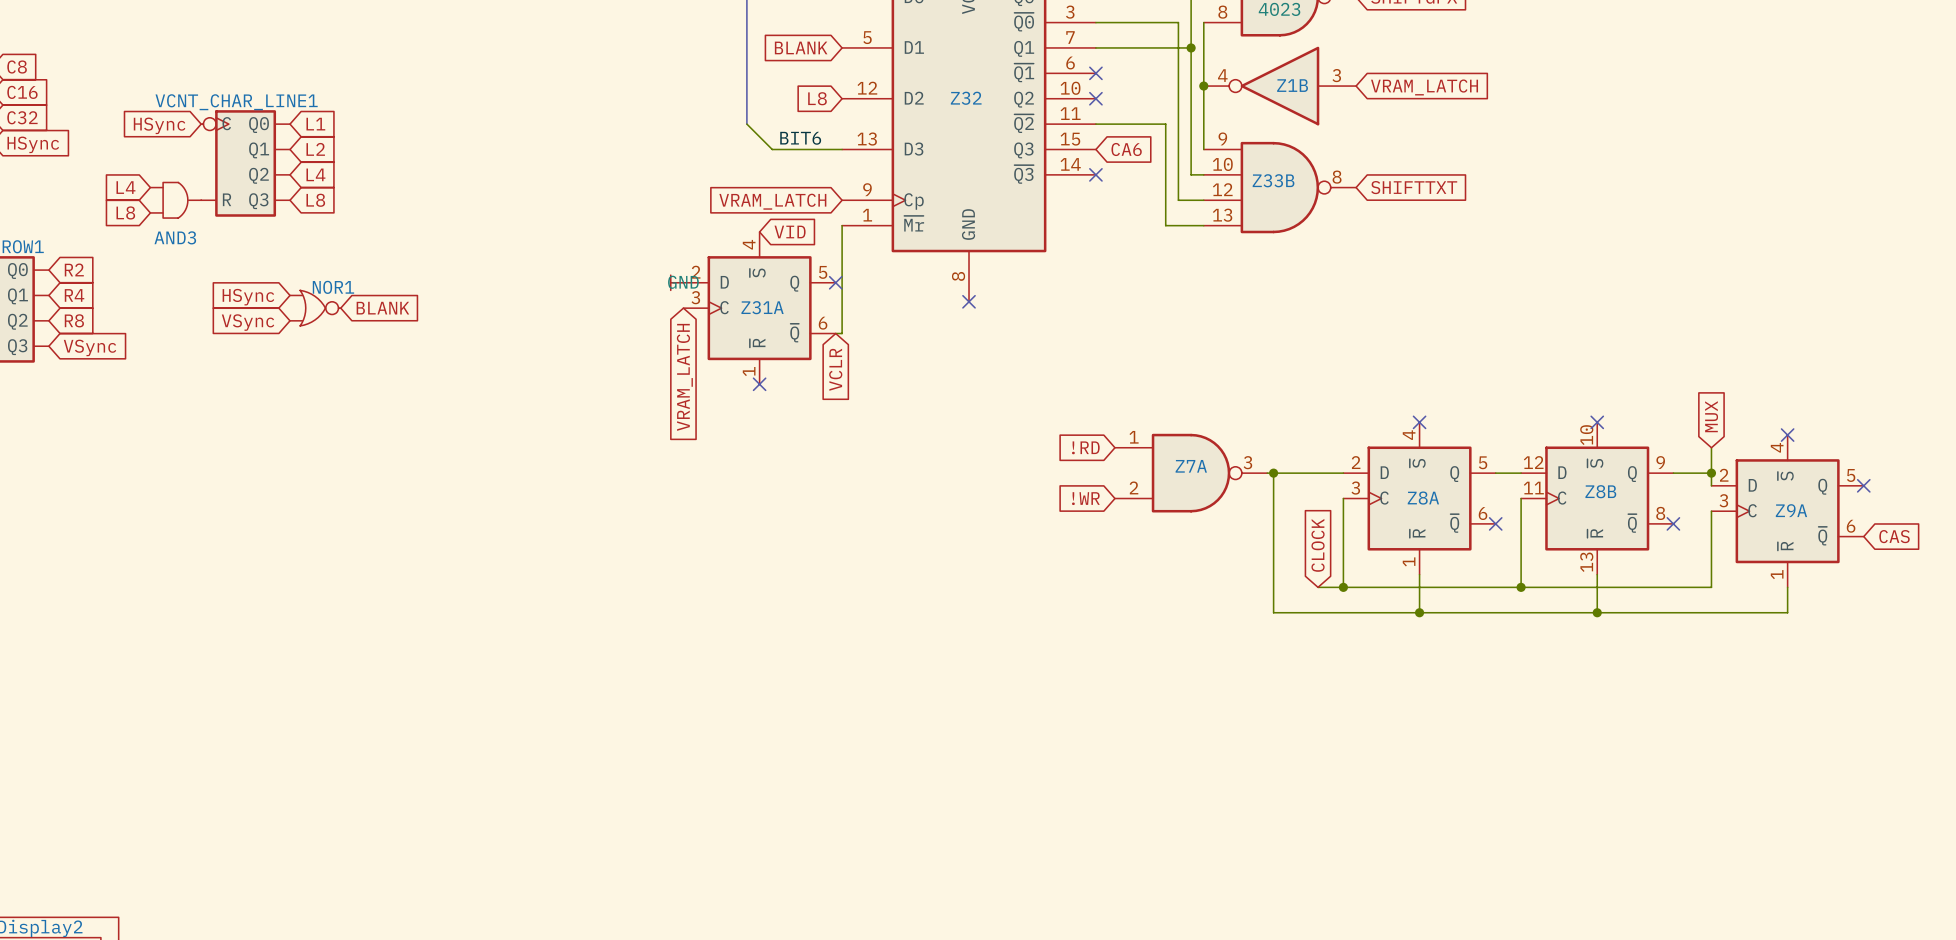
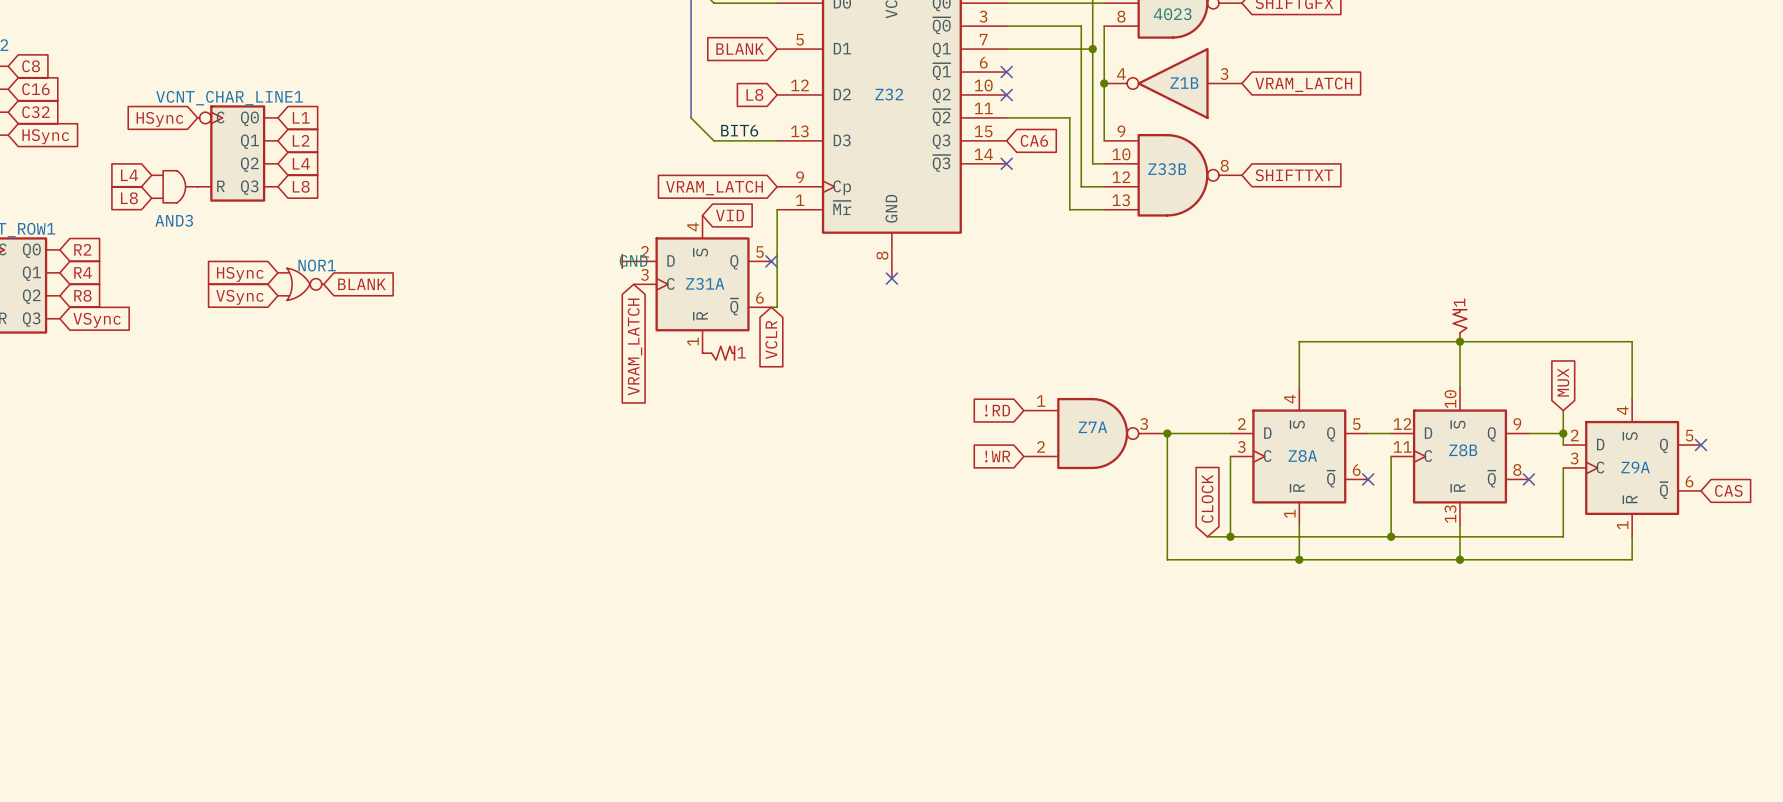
part: none -> (1459, 325)
wire: none -> (1459, 341) (1459, 387)
junction: none -> (1459, 341)
no-connect mark: (759, 384) -> none
part: none -> (718, 353)
wire: none -> (1299, 387) (1299, 341) (1632, 341) (1632, 399)
no-connect mark: (1419, 422) -> none
no-connect mark: (1597, 422) -> none
no-connect mark: (1787, 435) -> none

